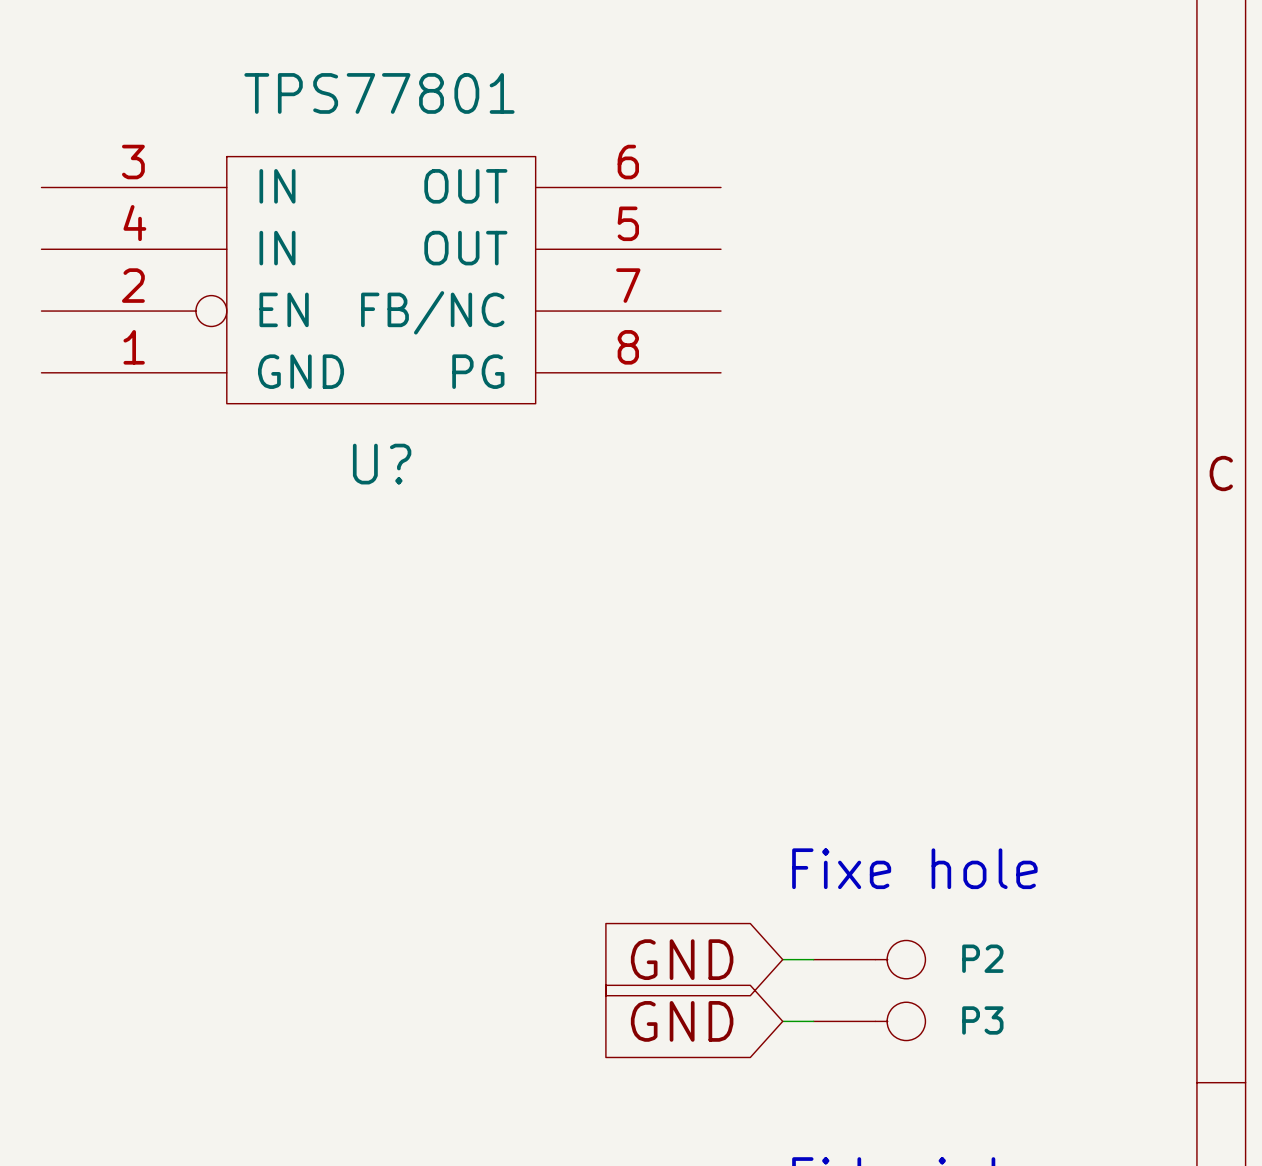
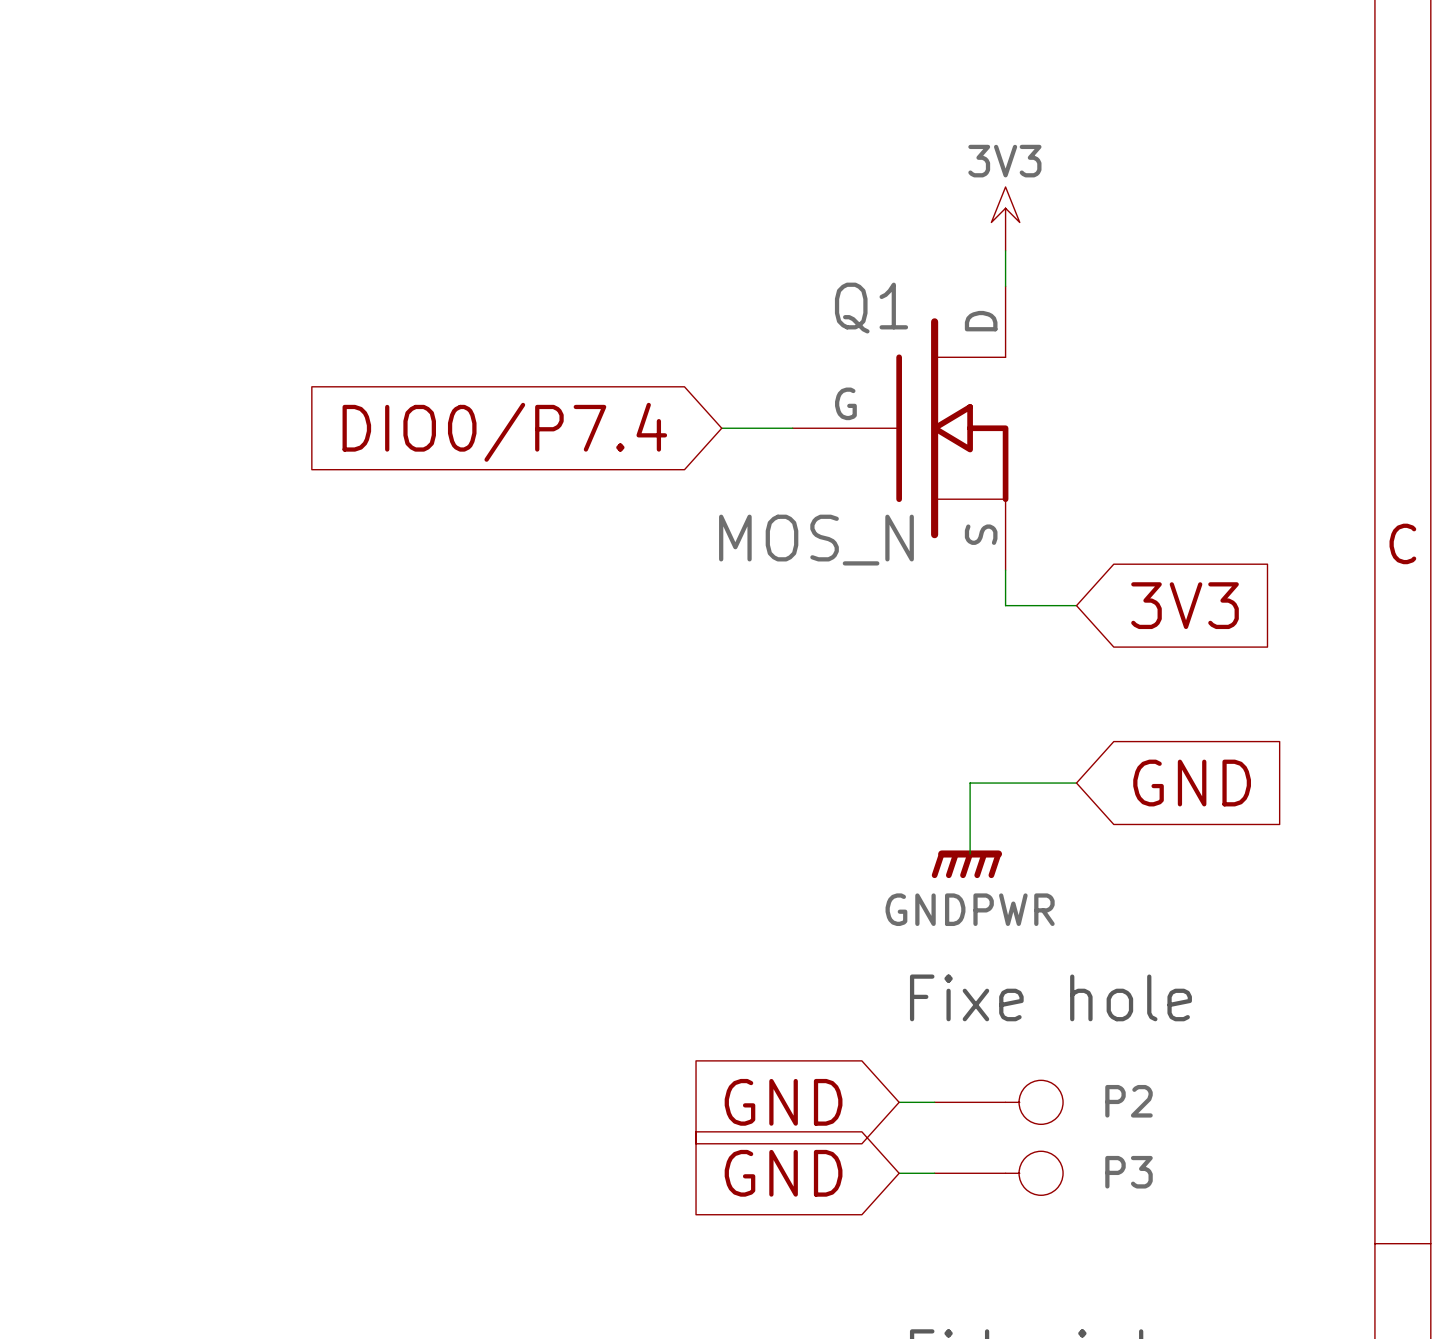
power symbol: none -> 3V3 (1005, 218)
wire: none -> (1005, 250) (1005, 286)
U?: TPS77801 (381, 280) -> none
Q1: none -> MOS_N (900, 428)
global label: none -> DIO0/P7.4 (504, 432)
wire: none -> (1005, 570) (1005, 605) (1076, 605)
global label: none -> 3V3 (1185, 605)
wire: none -> (1076, 783) (970, 783) (970, 853)
global label: none -> GND (1192, 783)
power symbol: none -> GNDPWR (966, 864)

